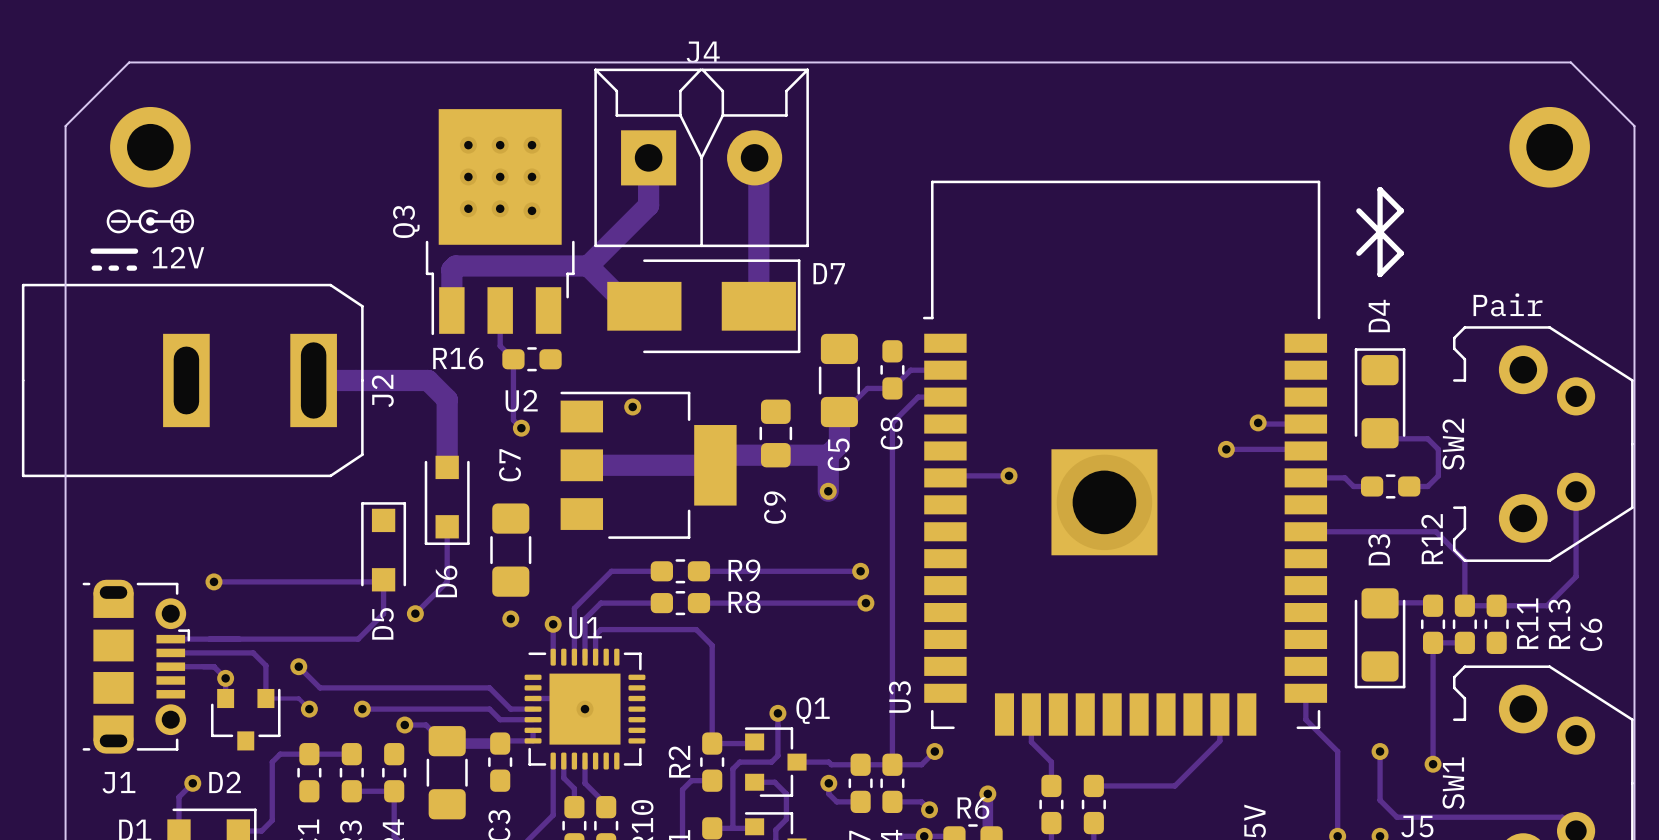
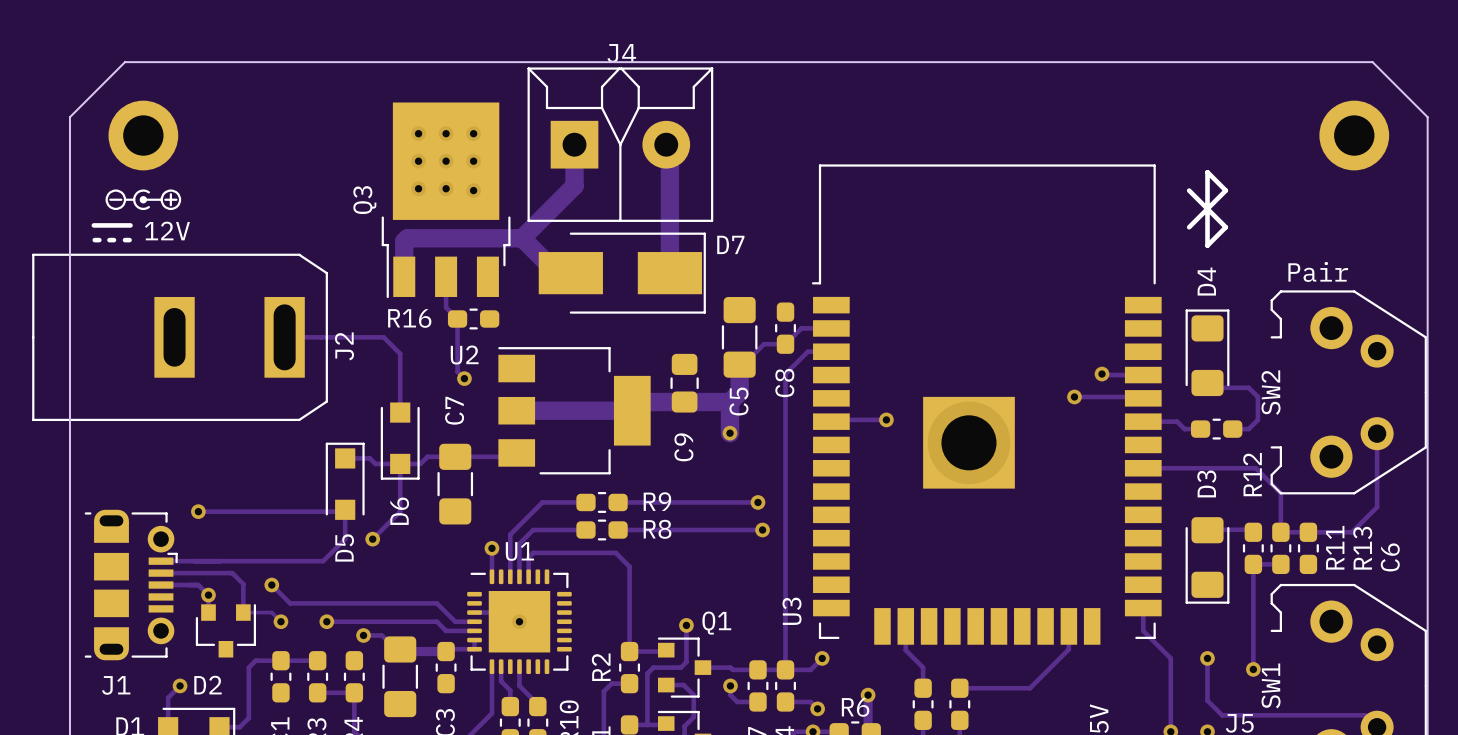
track width: thick (313, 380) (428, 380) (447, 399) (447, 467) -> thin (284, 337) (383, 337) (400, 353) (400, 412)
via: (632, 406) -> none
track: none -> (512, 456) (427, 456) (420, 463) (375, 463) (369, 458) (345, 458)
via: (510, 619) -> none

